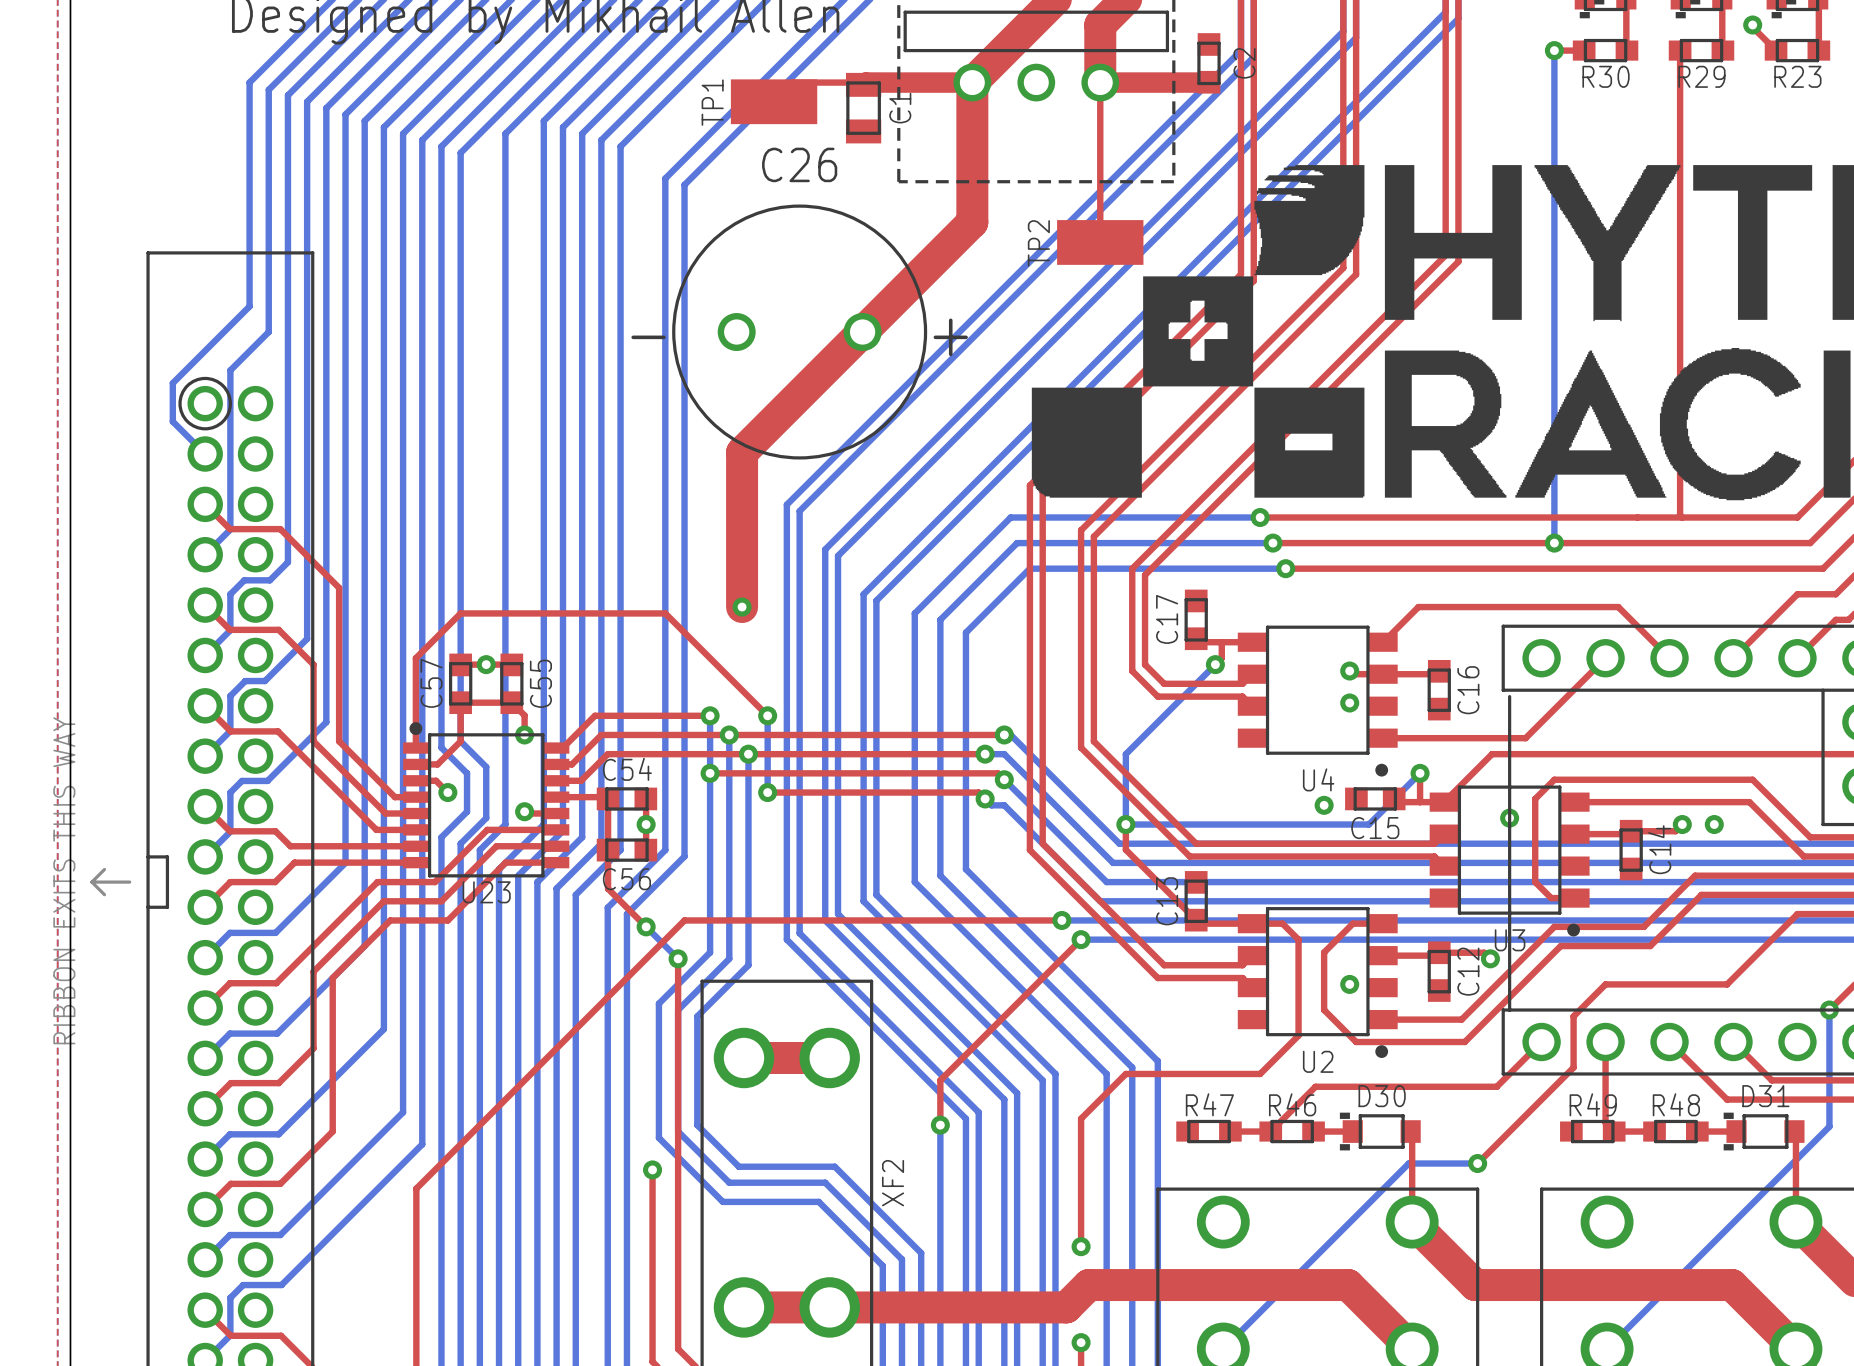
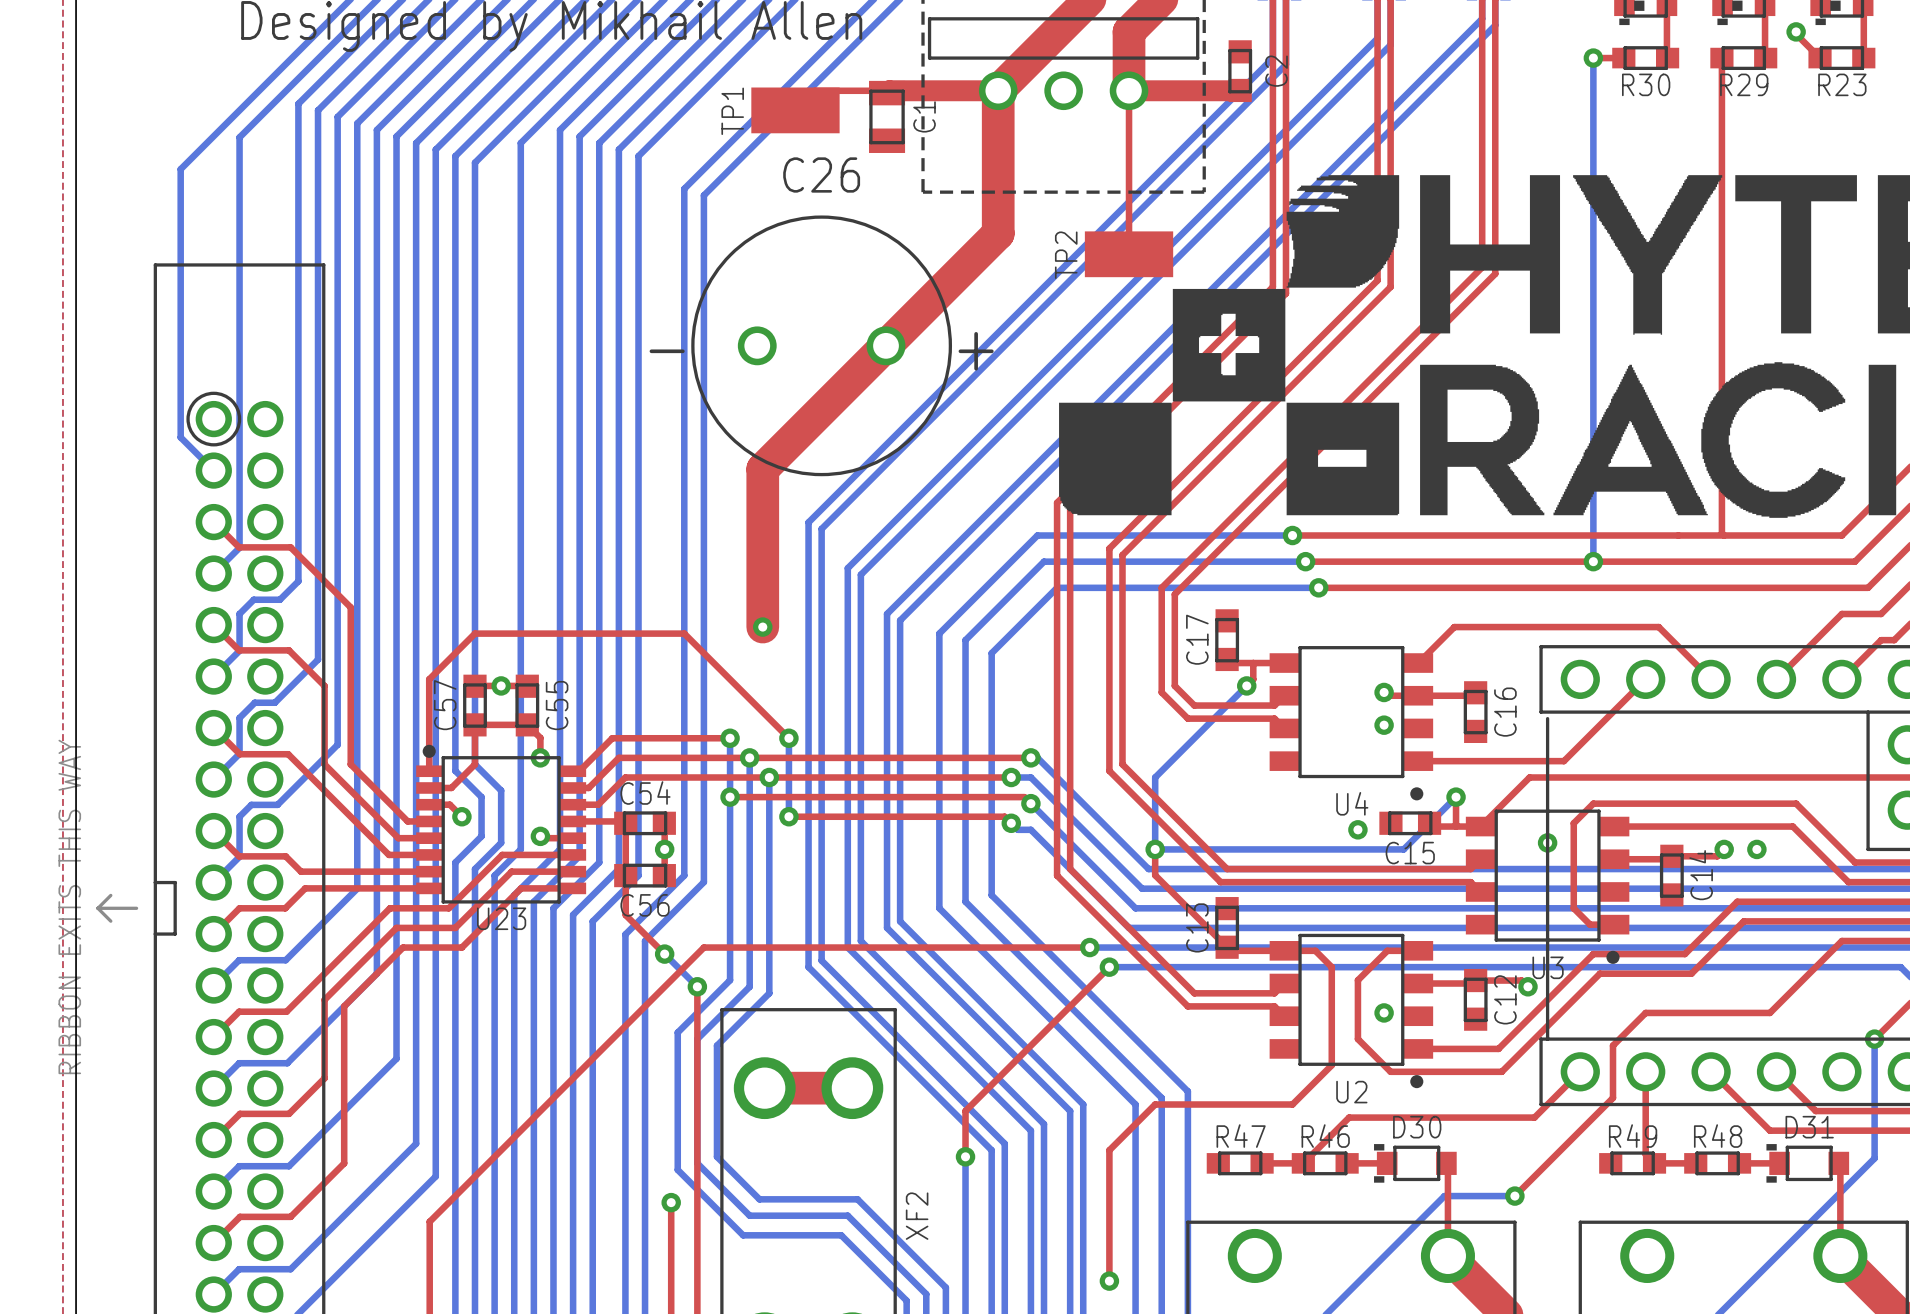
bottom track: (249, 82) (249, 306) (172, 383) -> (259, 90) (180, 169) (180, 398)
bottom track: (268, 89) (268, 332) (230, 370) -> (278, 98) (239, 137) (239, 385)

